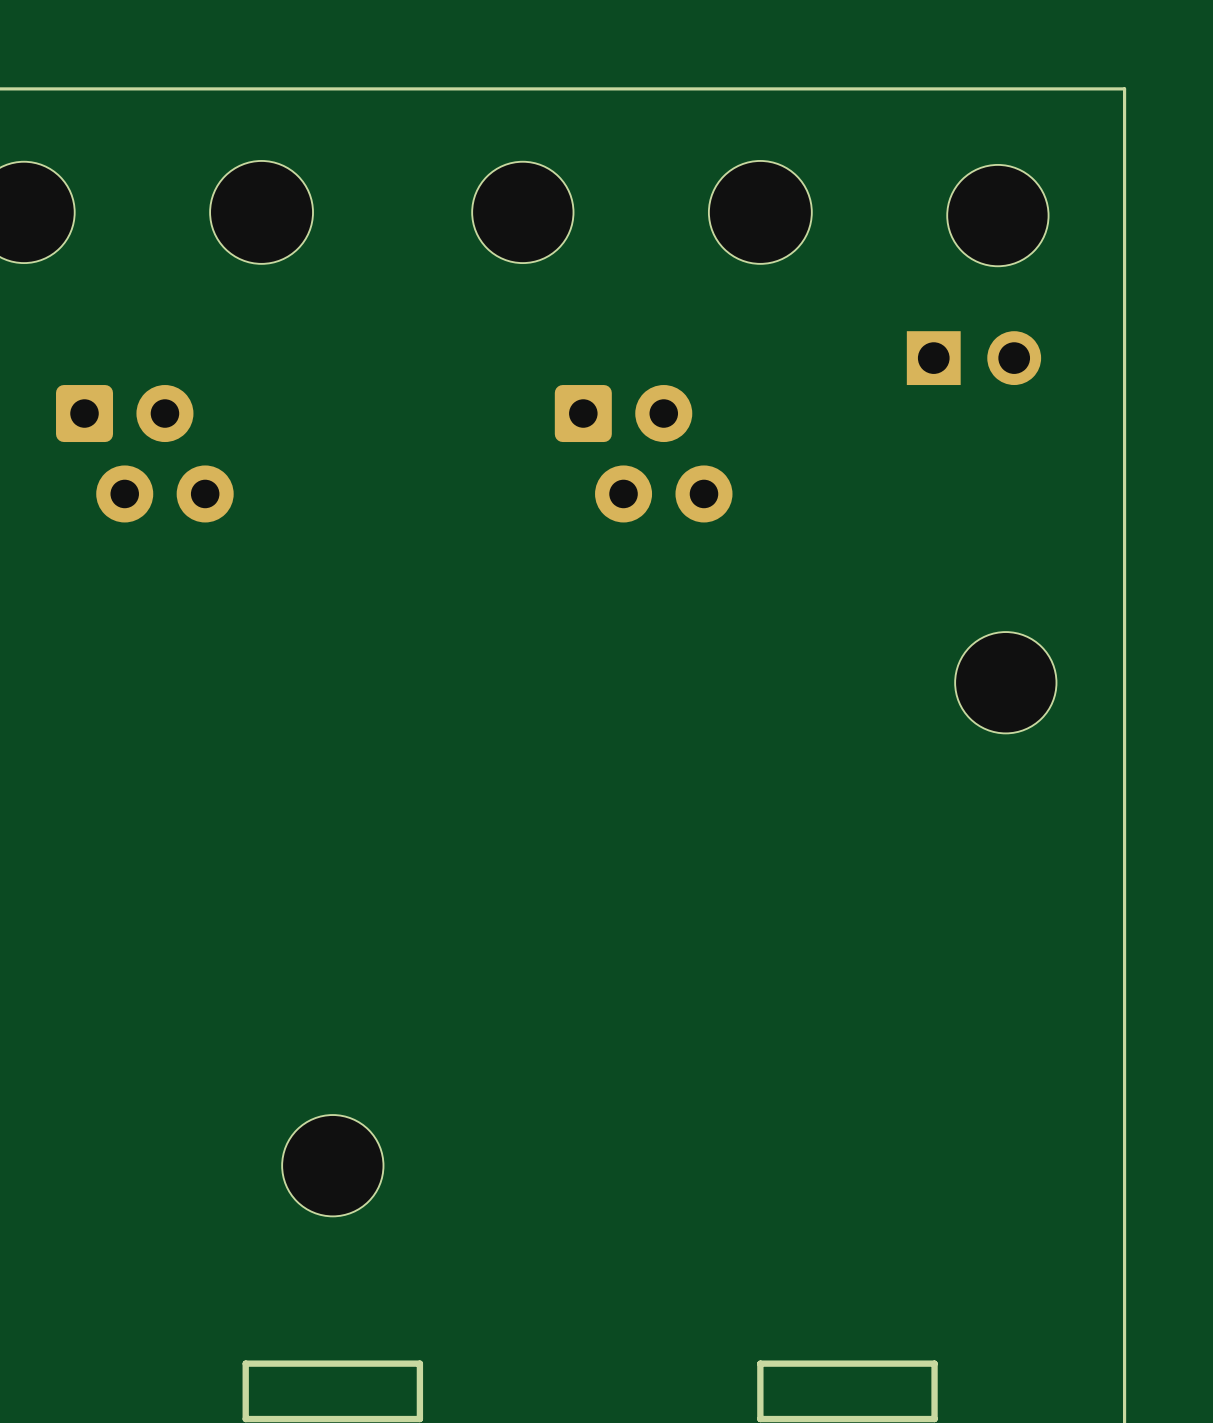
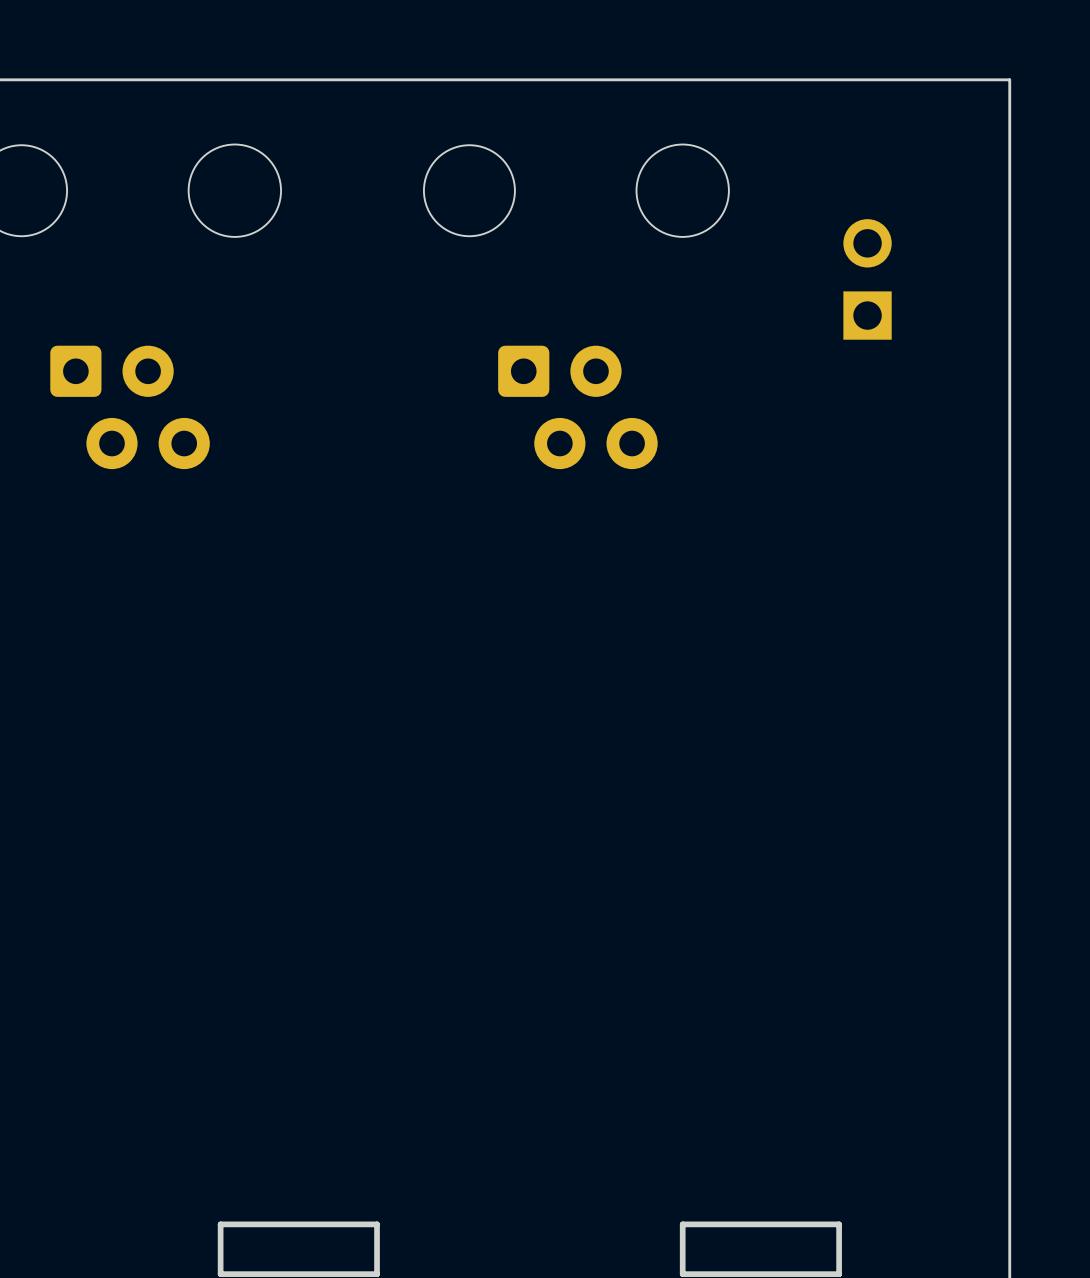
part: (997, 215) -> none
part rotation: 0° (973, 358) -> 90° counterclockwise (867, 279)
part: (1005, 682) -> none
part: (332, 1165) -> none

